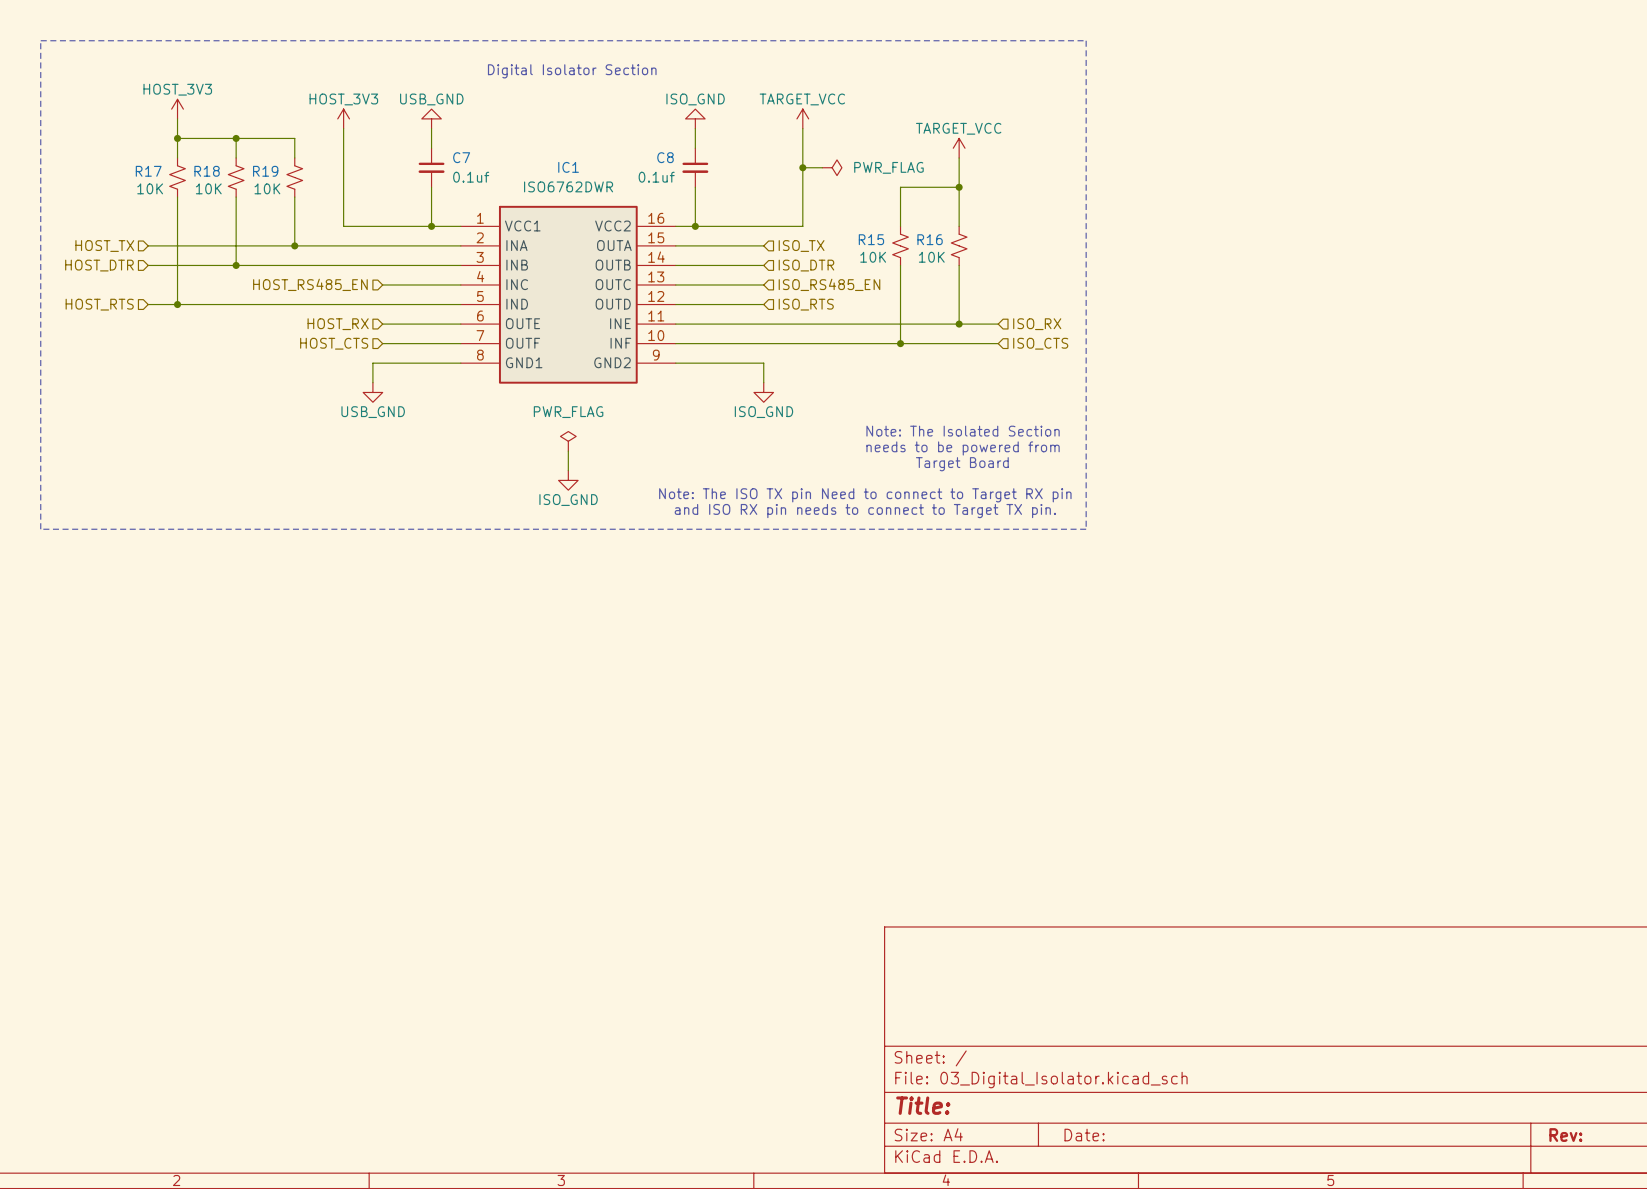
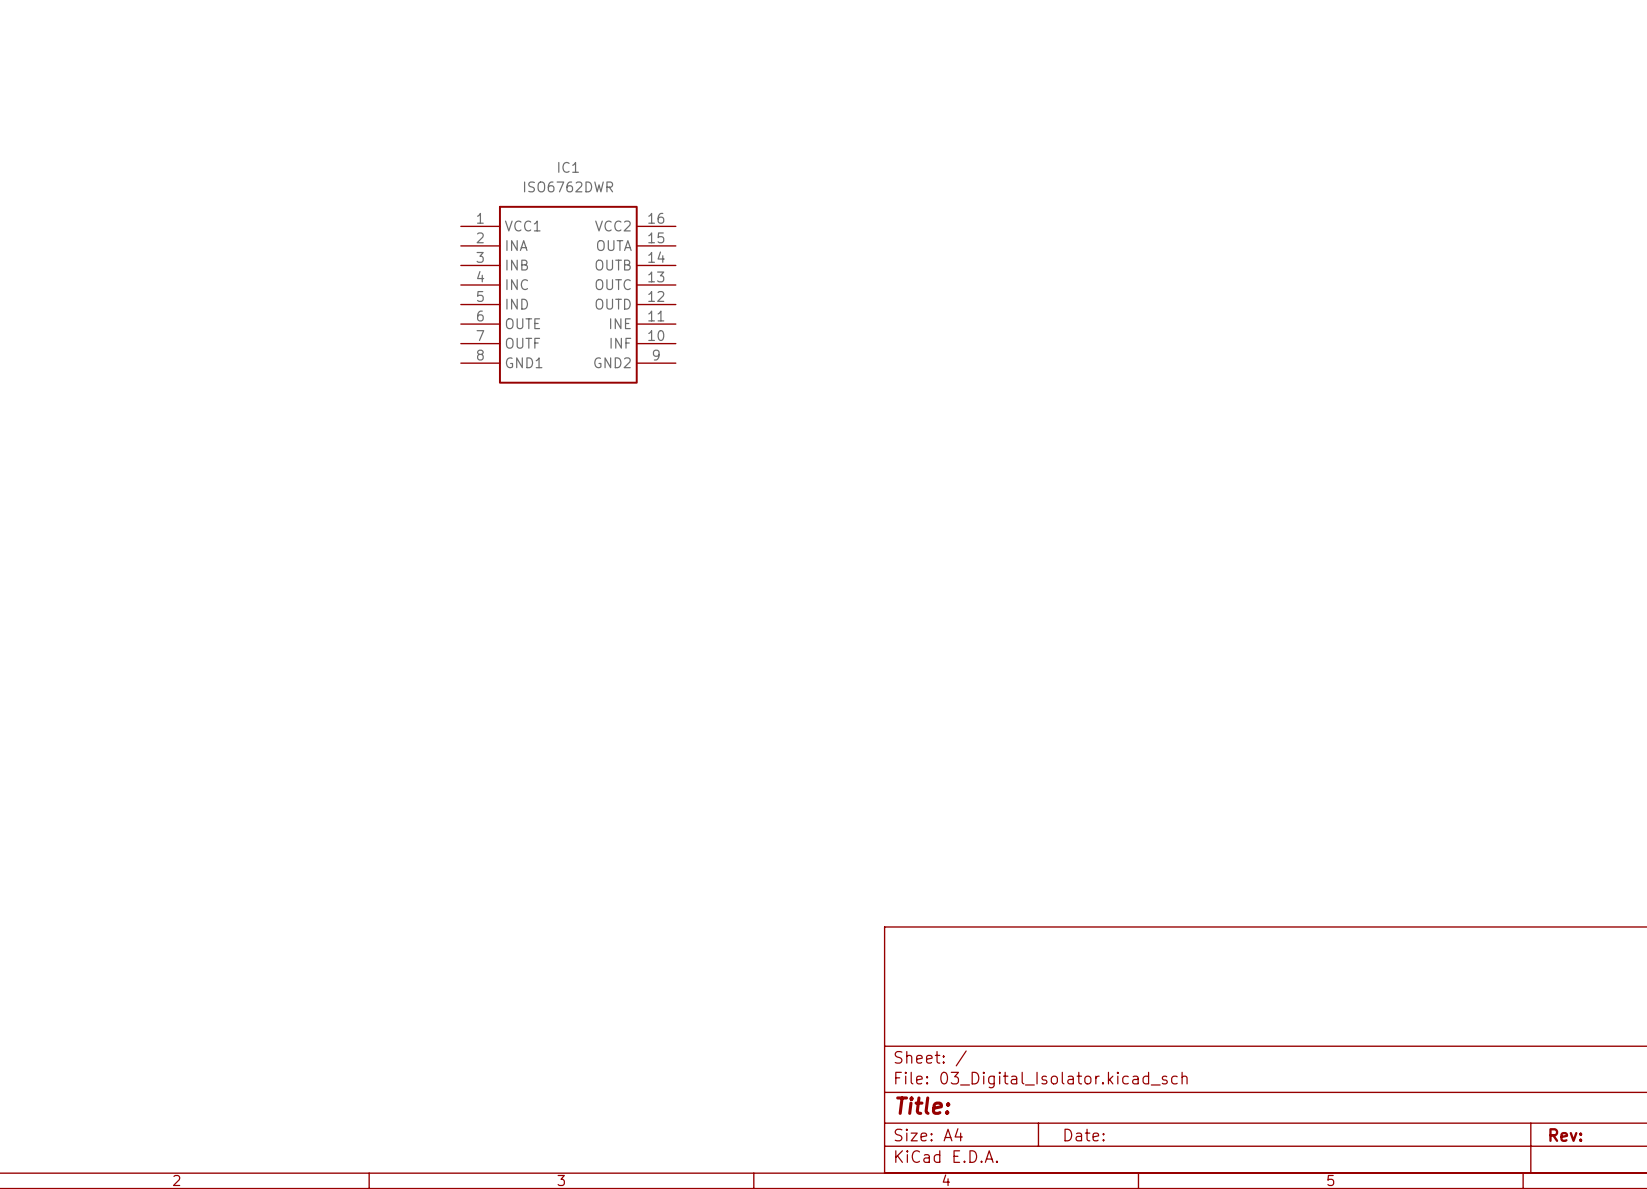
line: (40, 40) (1086, 40) (1086, 529) (40, 529) (40, 40) -> none
text: Digital Isolator Section (572, 71) -> none
power symbol: HOST_3V3 (177, 109) -> none
wire: (177, 118) (177, 157) -> none
power symbol: HOST_3V3 (343, 118) -> none
power symbol: USB_GND (431, 118) -> none
power symbol: ISO_GND (695, 118) -> none
power symbol: TARGET_VCC (802, 118) -> none
wire: (343, 128) (343, 226) (460, 226) -> none
wire: (431, 128) (431, 148) -> none
wire: (695, 128) (695, 148) -> none
wire: (802, 128) (802, 226) (675, 226) -> none
wire: (177, 138) (294, 138) (294, 157) -> none
junction: (177, 138) -> none
wire: (236, 138) (236, 157) -> none
junction: (236, 138) -> none
power symbol: TARGET_VCC (959, 148) -> none
wire: (959, 157) (959, 226) -> none
C7: 0.1uf (431, 167) -> none
C8: 0.1uf (695, 167) -> none
wire: (802, 167) (822, 167) -> none
junction: (802, 167) -> none
power symbol: PWR_FLAG (832, 167) -> none
R17: 10K (177, 177) -> none
R18: 10K (236, 177) -> none
R19: 10K (294, 177) -> none
wire: (431, 187) (431, 226) -> none
wire: (695, 187) (695, 226) -> none
wire: (959, 187) (900, 187) (900, 226) -> none
junction: (959, 187) -> none
wire: (177, 197) (177, 304) -> none
wire: (236, 197) (236, 265) -> none
wire: (294, 197) (294, 245) -> none
junction: (431, 226) -> none
junction: (695, 226) -> none
wire: (148, 245) (460, 245) -> none
junction: (294, 245) -> none
wire: (675, 245) (763, 245) -> none
R15: 10K (900, 245) -> none
R16: 10K (959, 245) -> none
hierarchical label: HOST_TX (104, 246) -> none
hierarchical label: ISO_TX (801, 246) -> none
hierarchical label: HOST_DTR (99, 265) -> none
wire: (148, 265) (460, 265) -> none
junction: (236, 265) -> none
wire: (675, 265) (763, 265) -> none
hierarchical label: ISO_DTR (806, 265) -> none
wire: (900, 265) (900, 343) -> none
wire: (959, 265) (959, 324) -> none
hierarchical label: HOST_RS485_EN (310, 284) -> none
wire: (382, 284) (460, 284) -> none
wire: (675, 284) (763, 284) -> none
hierarchical label: ISO_RS485_EN (829, 284) -> none
hierarchical label: HOST_RTS (99, 304) -> none
wire: (148, 304) (460, 304) -> none
junction: (177, 304) -> none
wire: (675, 304) (763, 304) -> none
hierarchical label: ISO_RTS (806, 304) -> none
hierarchical label: HOST_RX (338, 324) -> none
wire: (382, 324) (460, 324) -> none
wire: (675, 324) (998, 324) -> none
junction: (959, 324) -> none
hierarchical label: ISO_RX (1037, 324) -> none
hierarchical label: HOST_CTS (334, 343) -> none
wire: (382, 343) (460, 343) -> none
wire: (675, 343) (998, 343) -> none
junction: (900, 343) -> none
hierarchical label: ISO_CTS (1040, 343) -> none
wire: (460, 363) (372, 363) (372, 382) -> none
wire: (675, 363) (763, 363) (763, 382) -> none
power symbol: USB_GND (372, 392) -> none
power symbol: ISO_GND (763, 392) -> none
text: Note: The Isolated Section (963, 431) -> none
power symbol: PWR_FLAG (568, 441) -> none
text: needs to be powered from (963, 448) -> none
wire: (568, 451) (568, 470) -> none
text: Target Board (962, 464) -> none
power symbol: ISO_GND (568, 480) -> none
text: Note: The ISO TX pin Need to connect to Target RX pin (865, 495) -> none
text: and ISO RX pin needs to connect to Target TX pin. (865, 511) -> none

